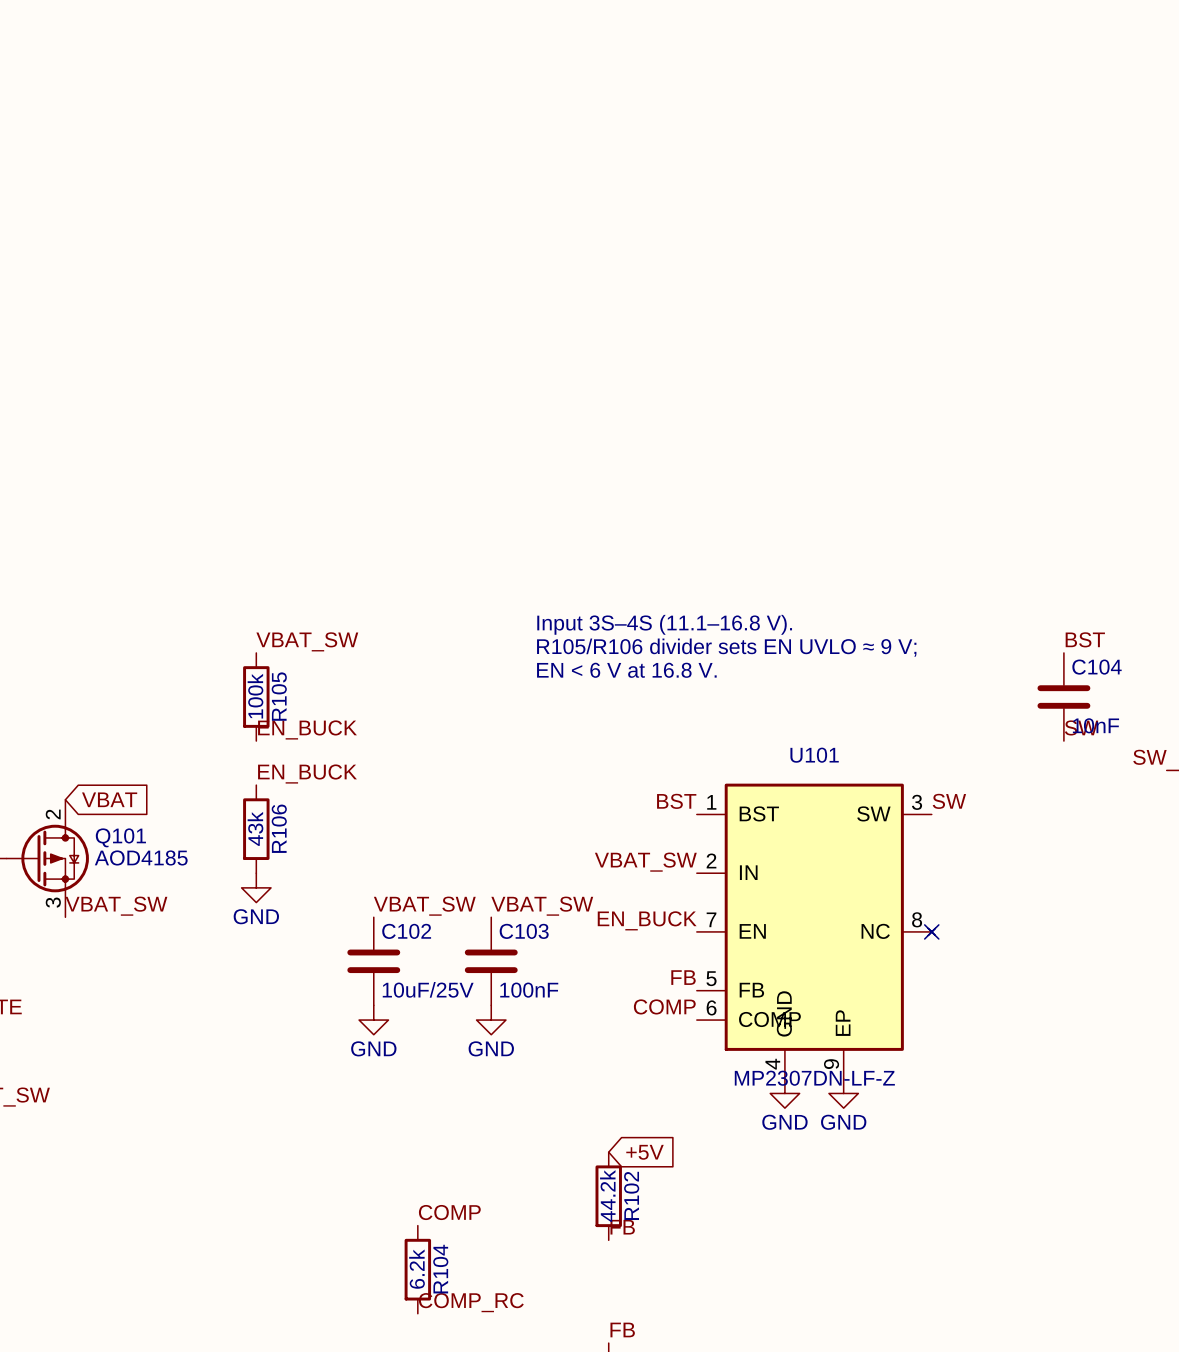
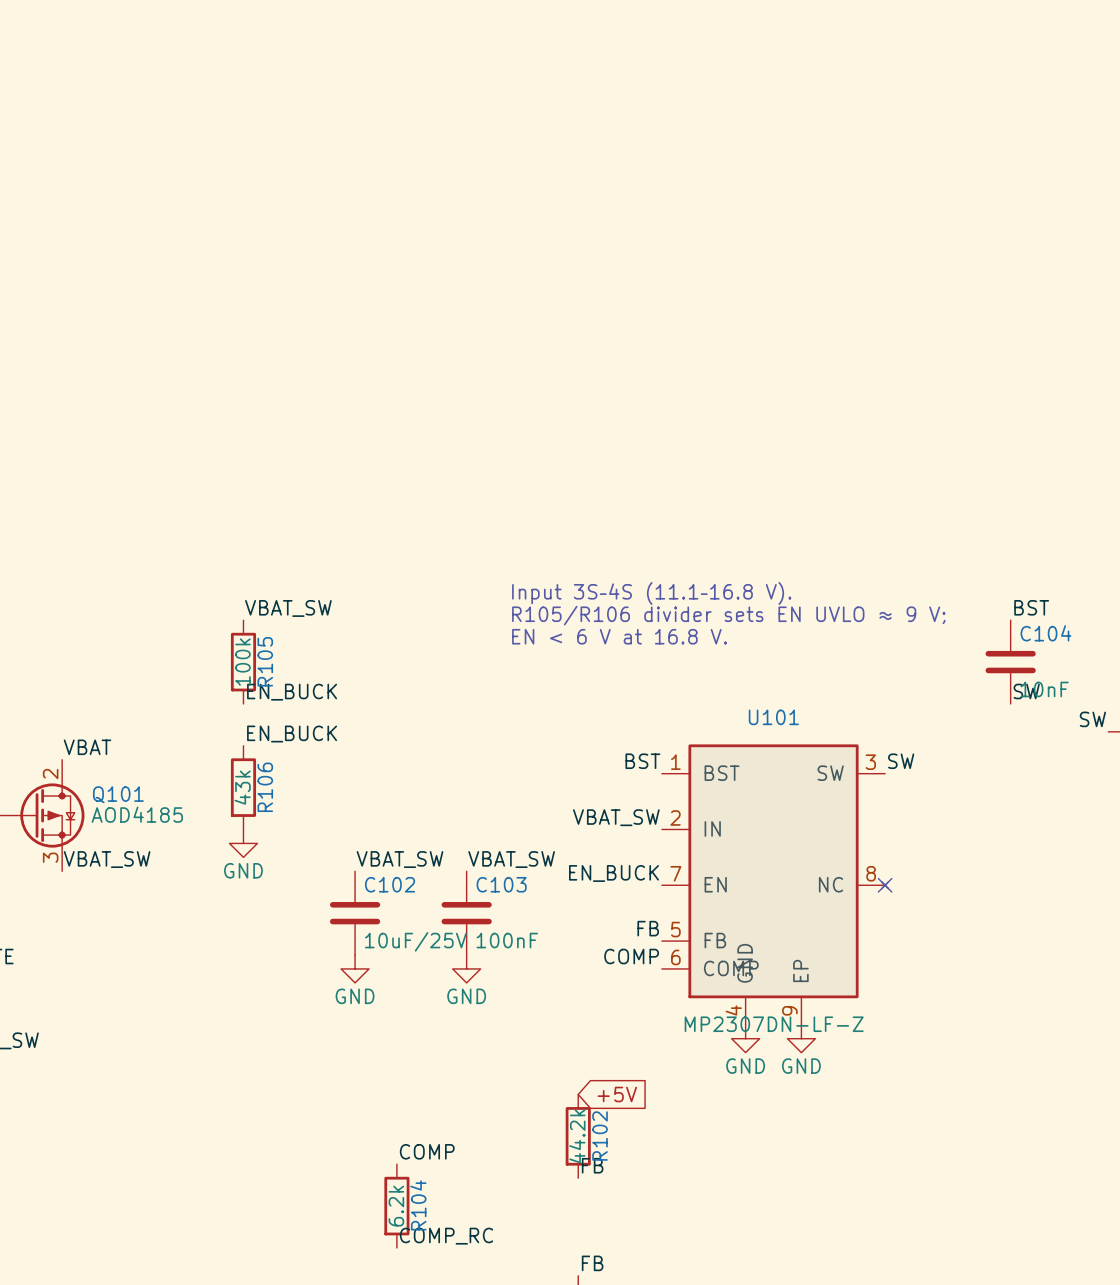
label: none -> VBAT (87, 747)
global label: VBAT (109, 799) -> none

